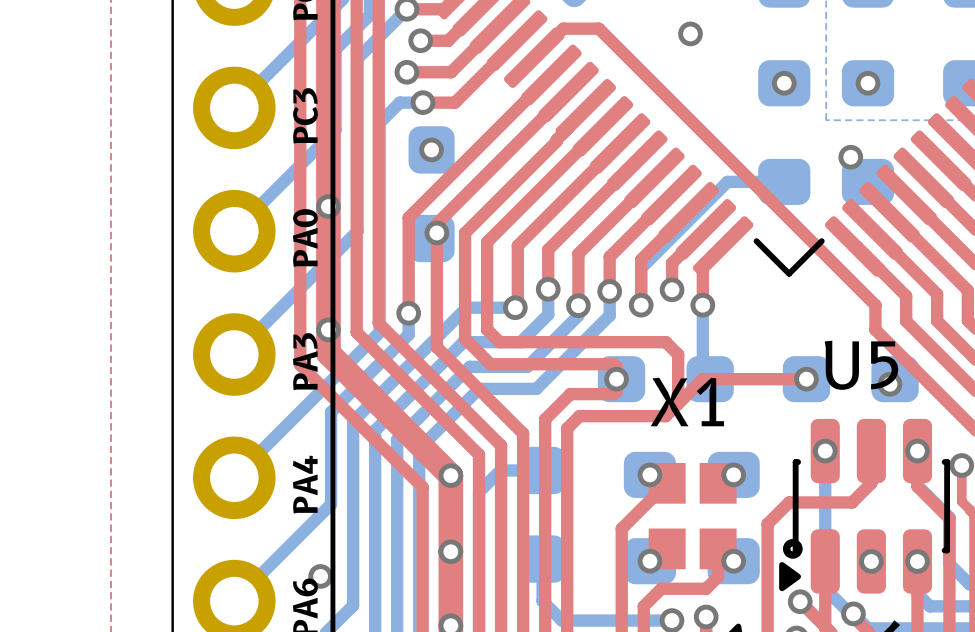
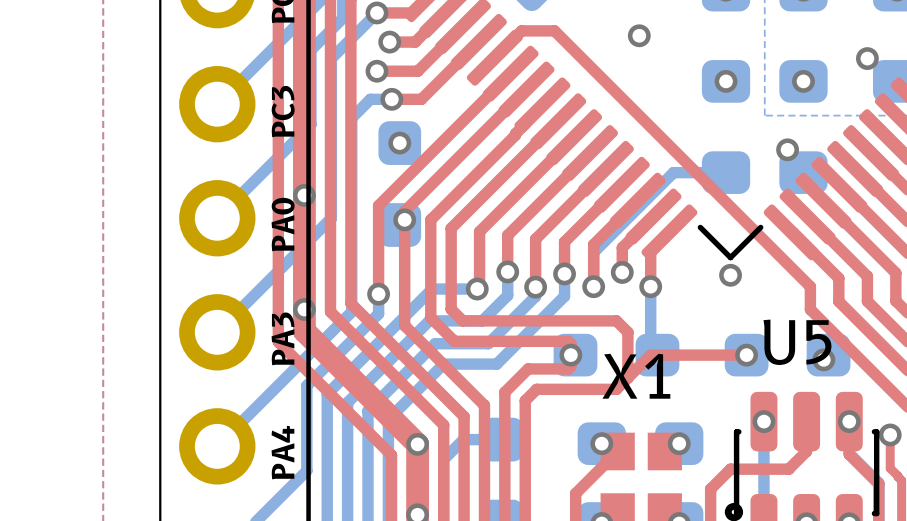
via: none -> (867, 58)
via: none -> (730, 275)

